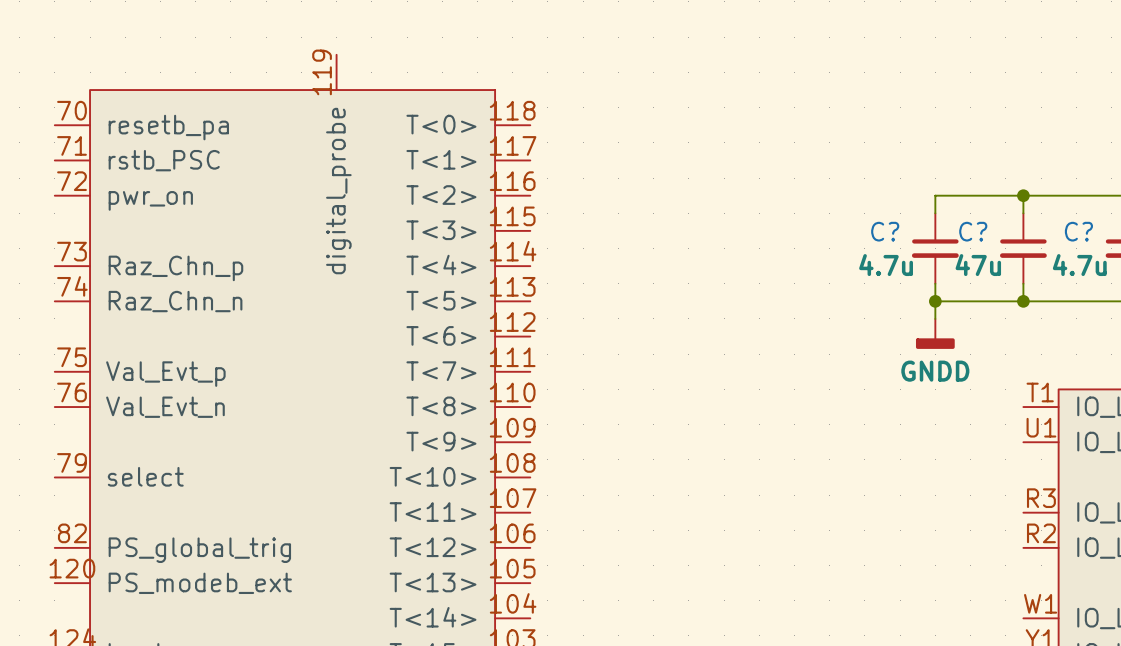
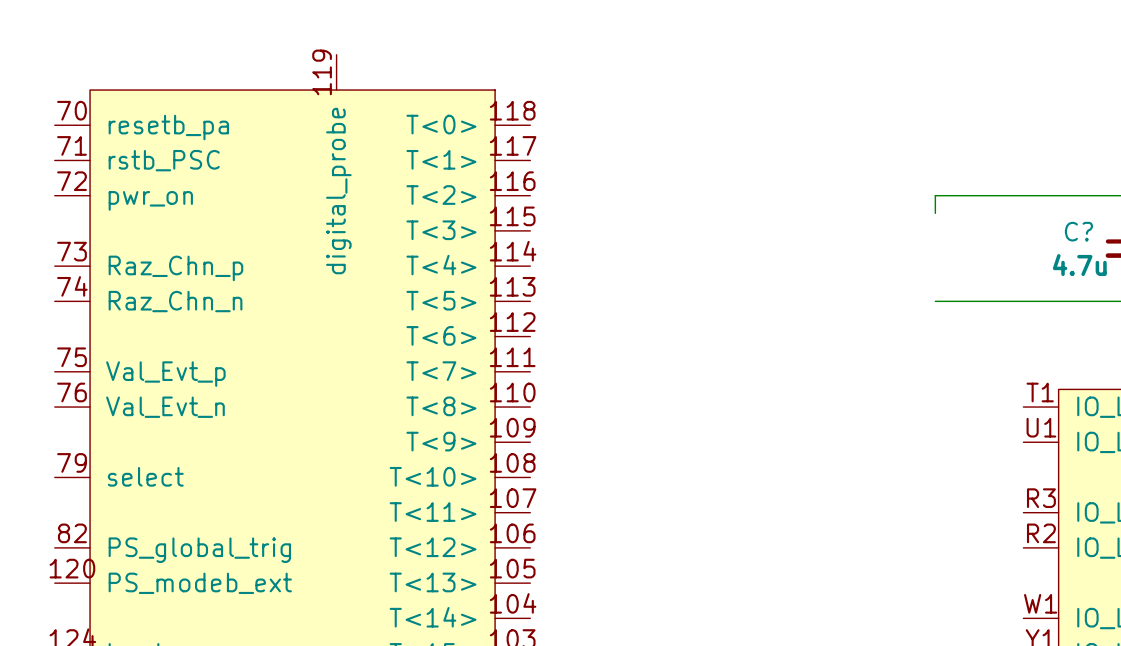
wire: (1023, 195) (1023, 213) -> none
junction: (1023, 195) -> none
C?: 4.7u (935, 248) -> none
C?: 47u (1023, 248) -> none
wire: (935, 283) (935, 318) -> none
wire: (1023, 283) (1023, 301) -> none
junction: (935, 301) -> none
junction: (1023, 301) -> none
power symbol: GNDD (935, 333) -> none

